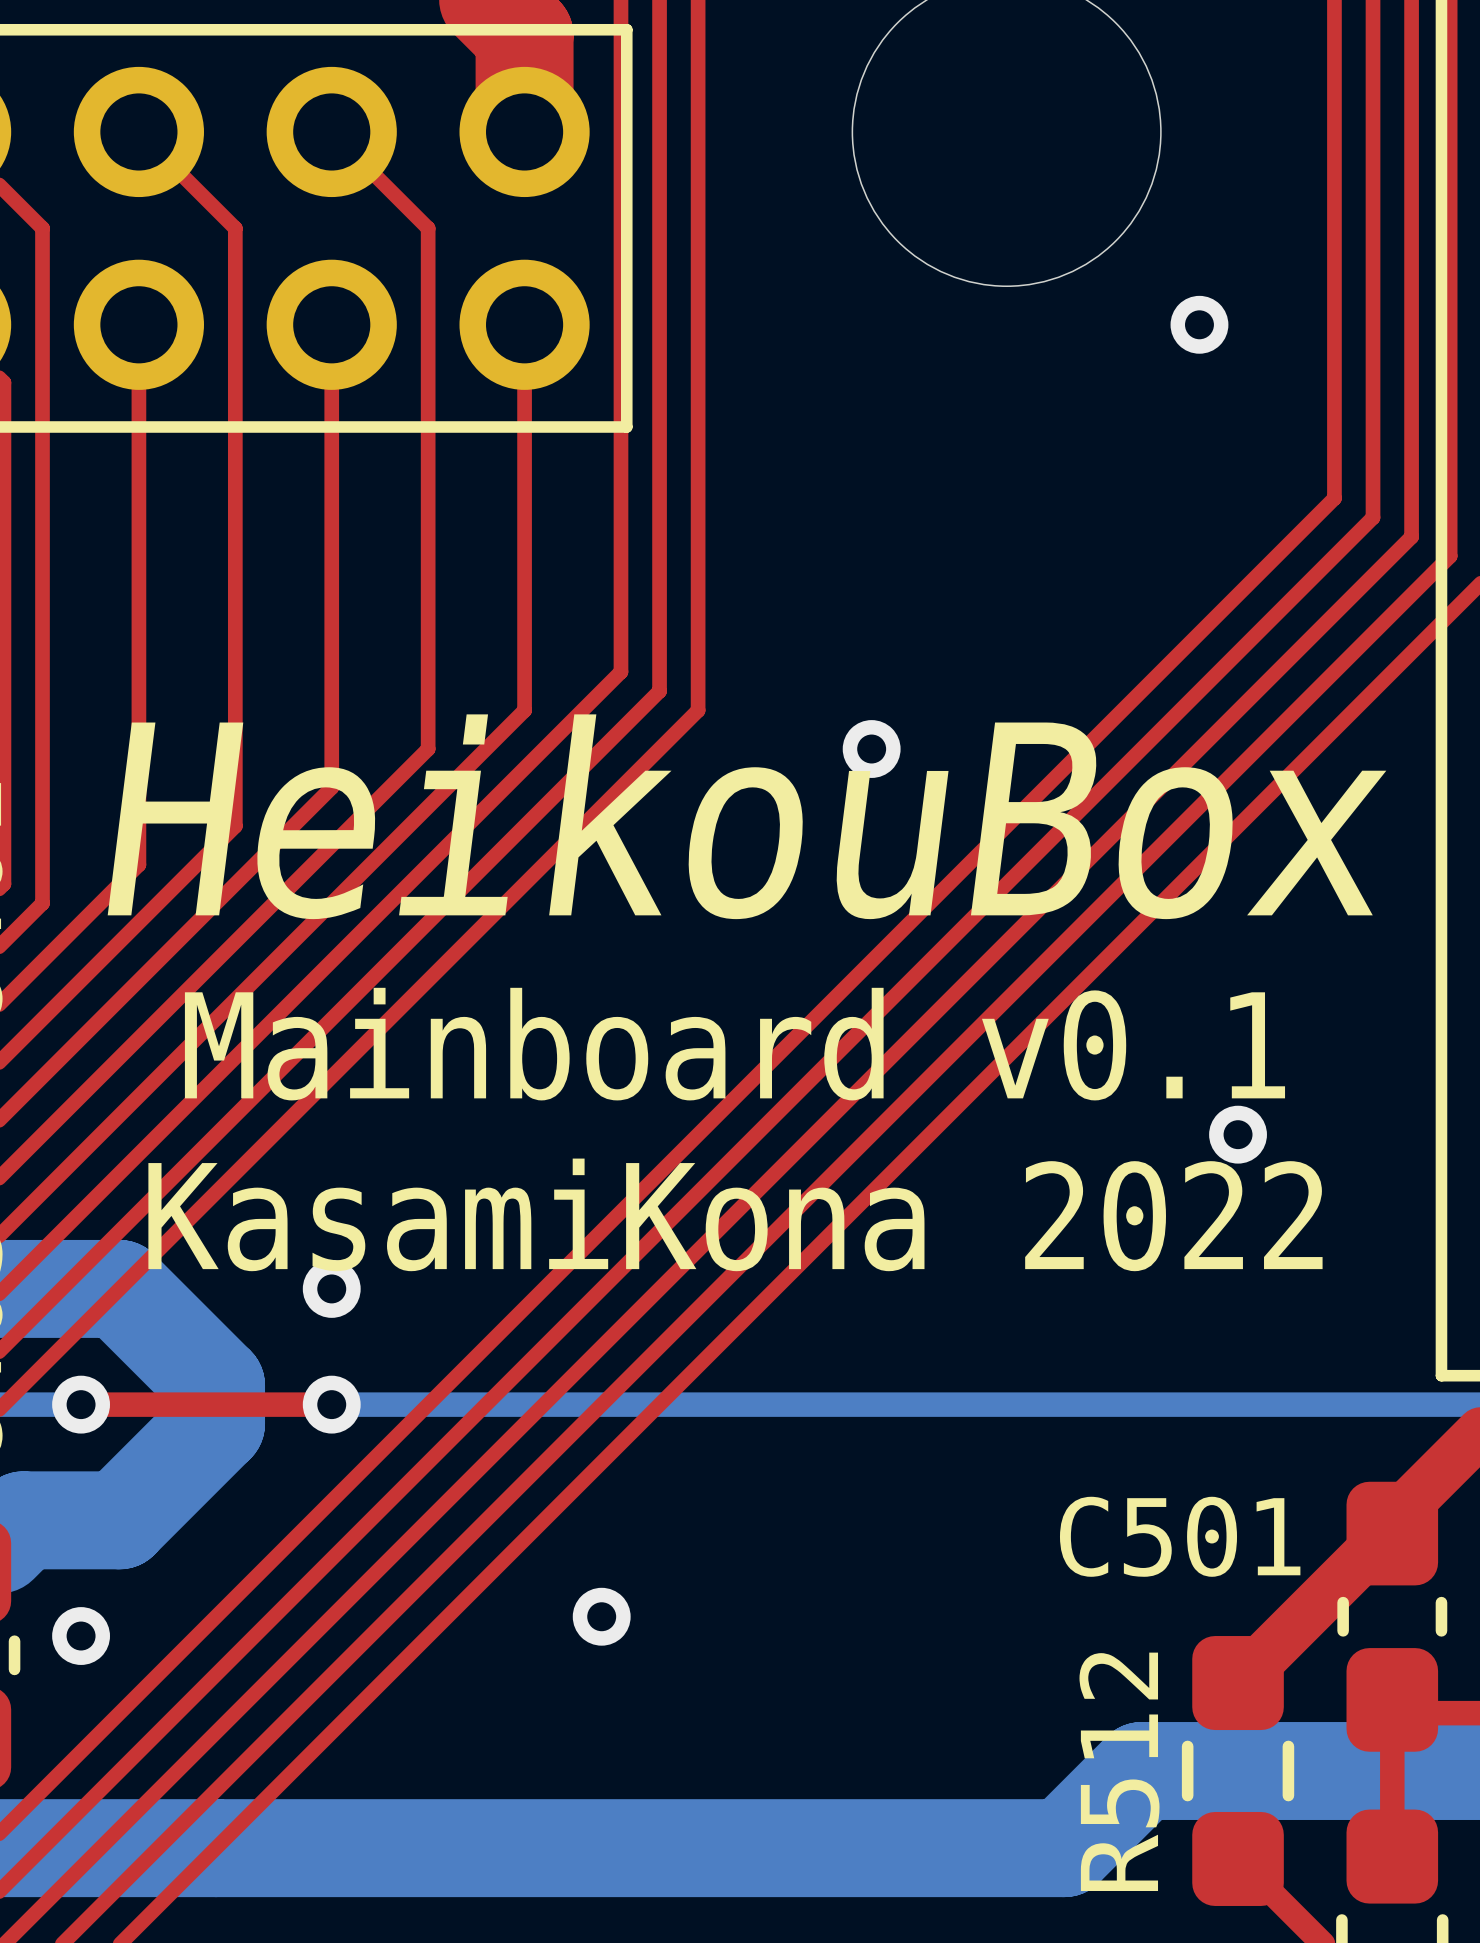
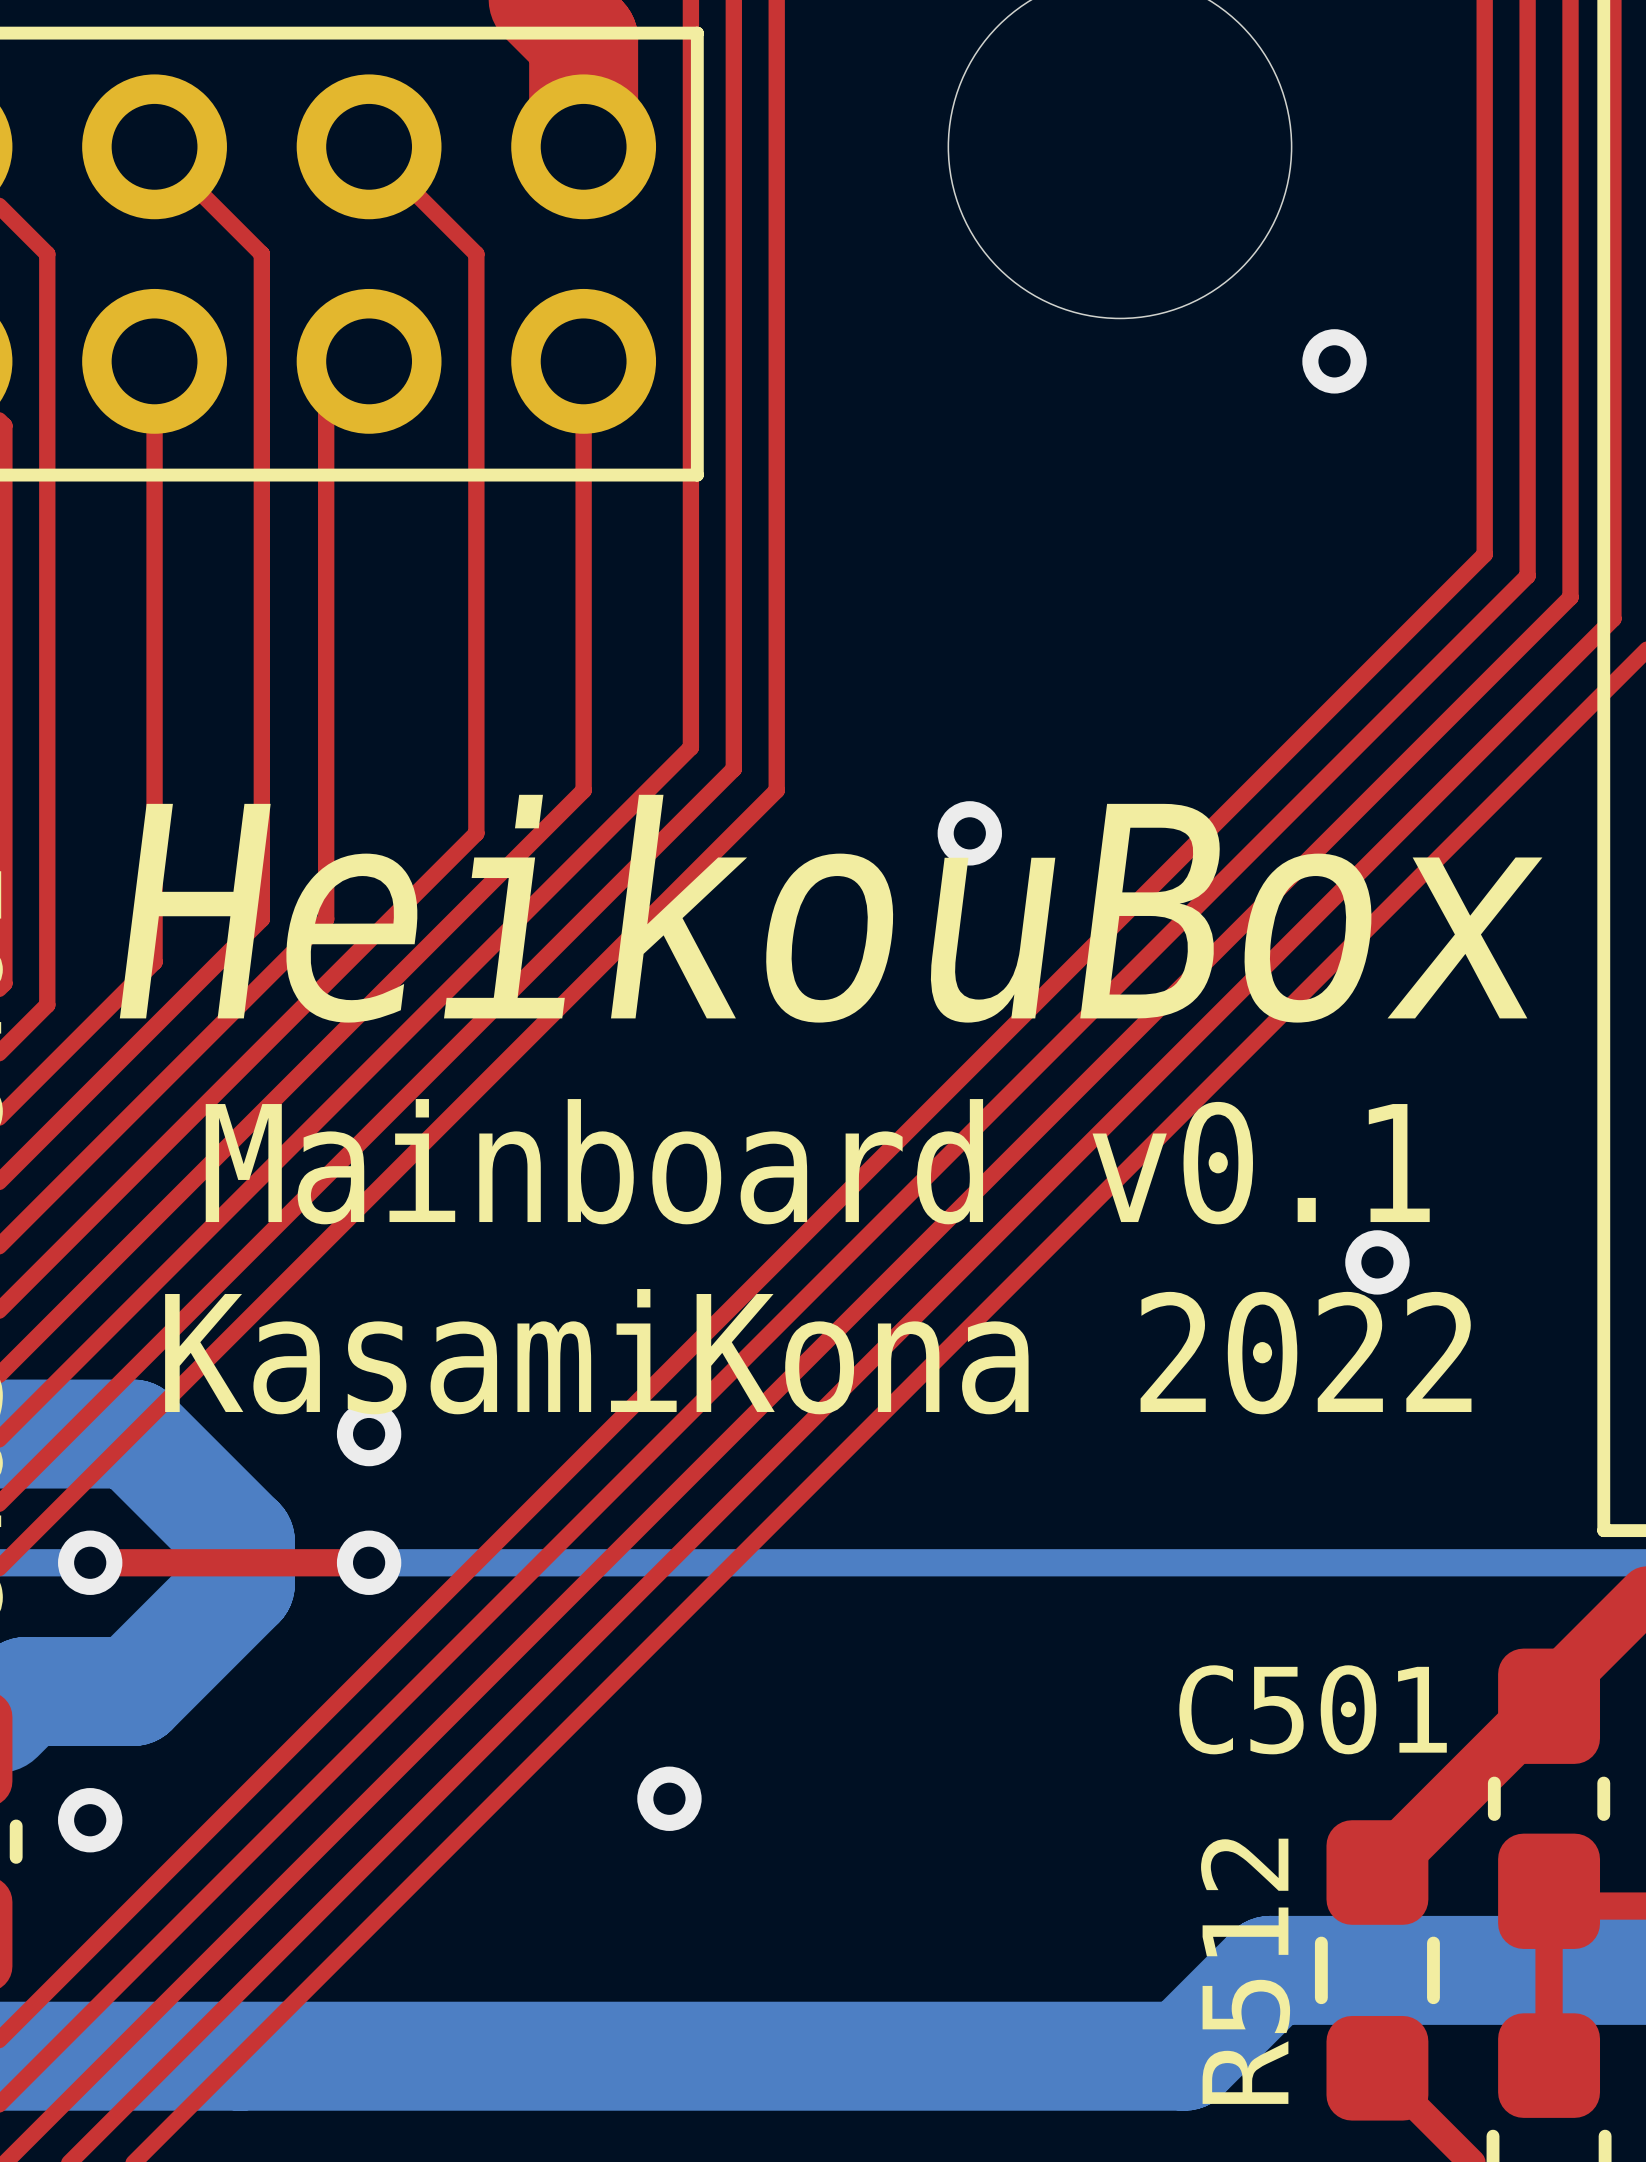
top track: (331, 324) (331, 787) (293, 826) -> (369, 361) (326, 404) (326, 919)

